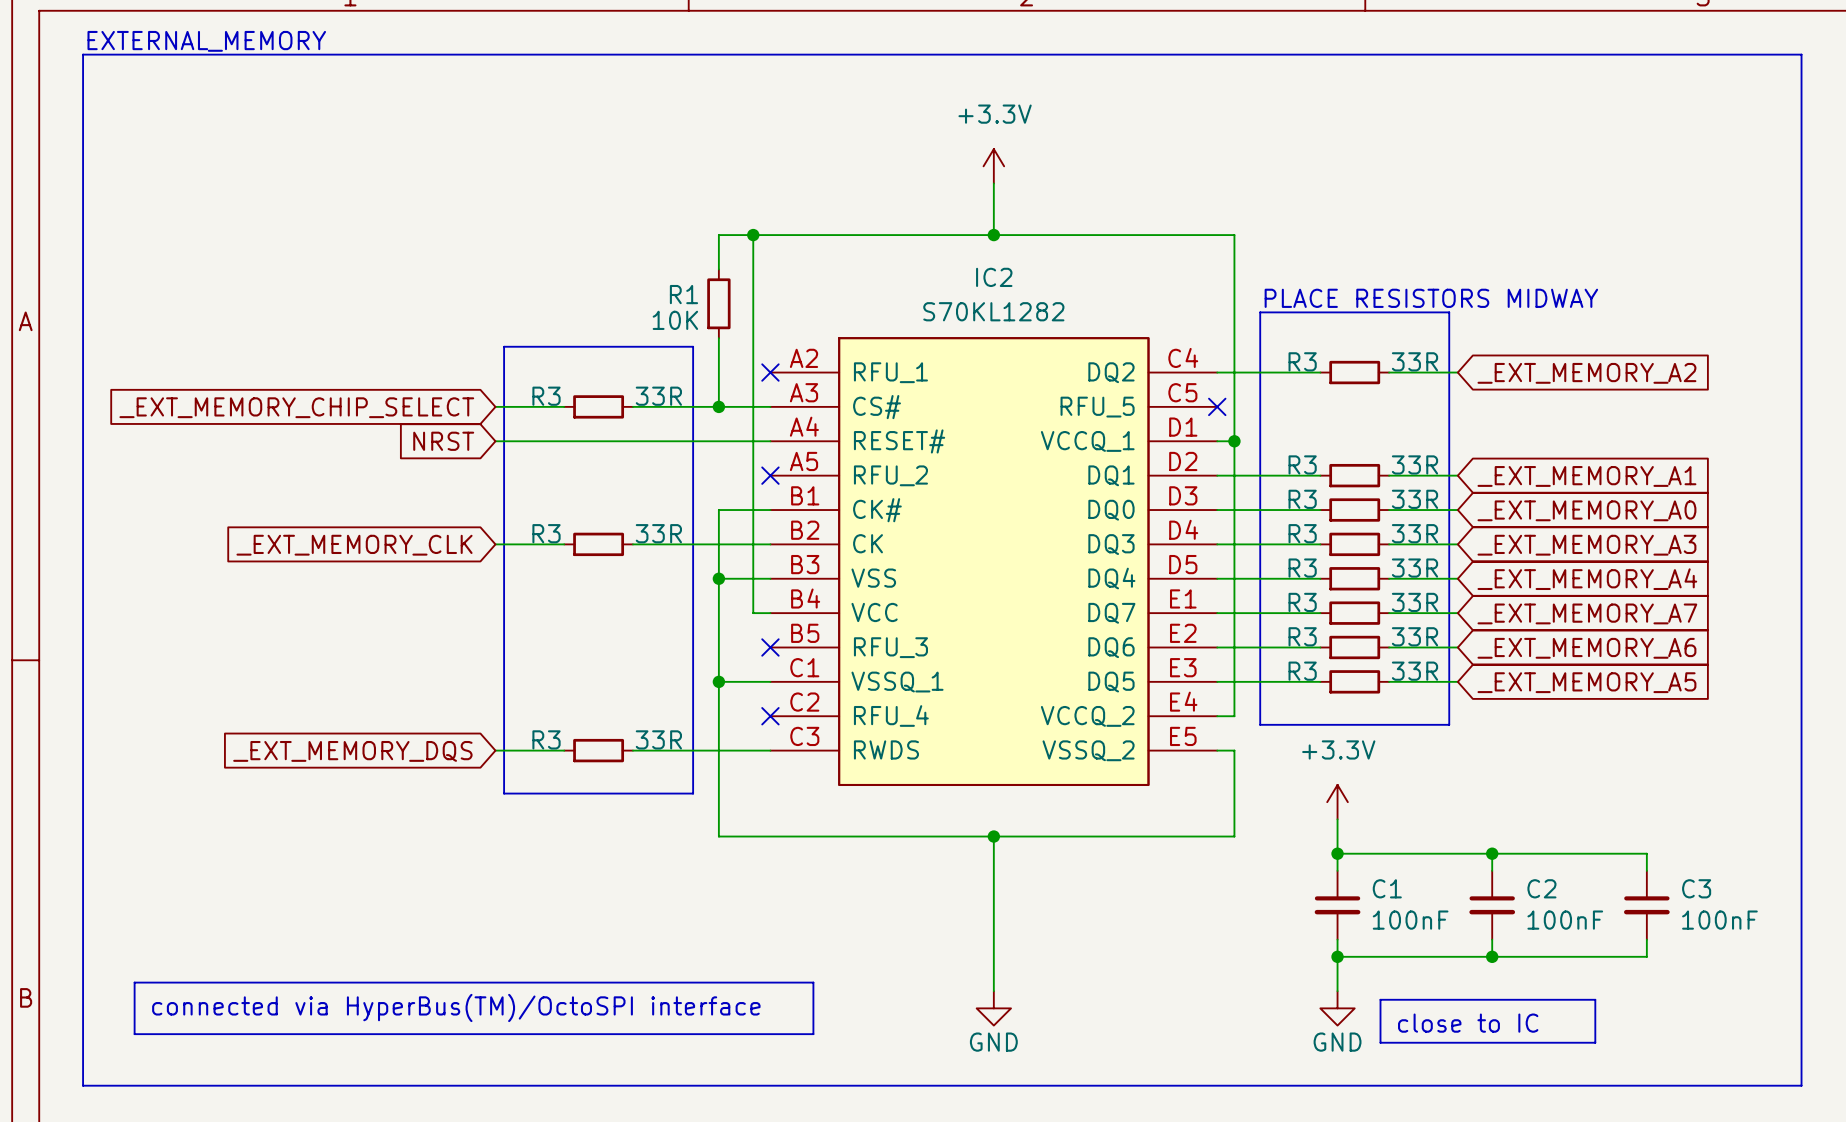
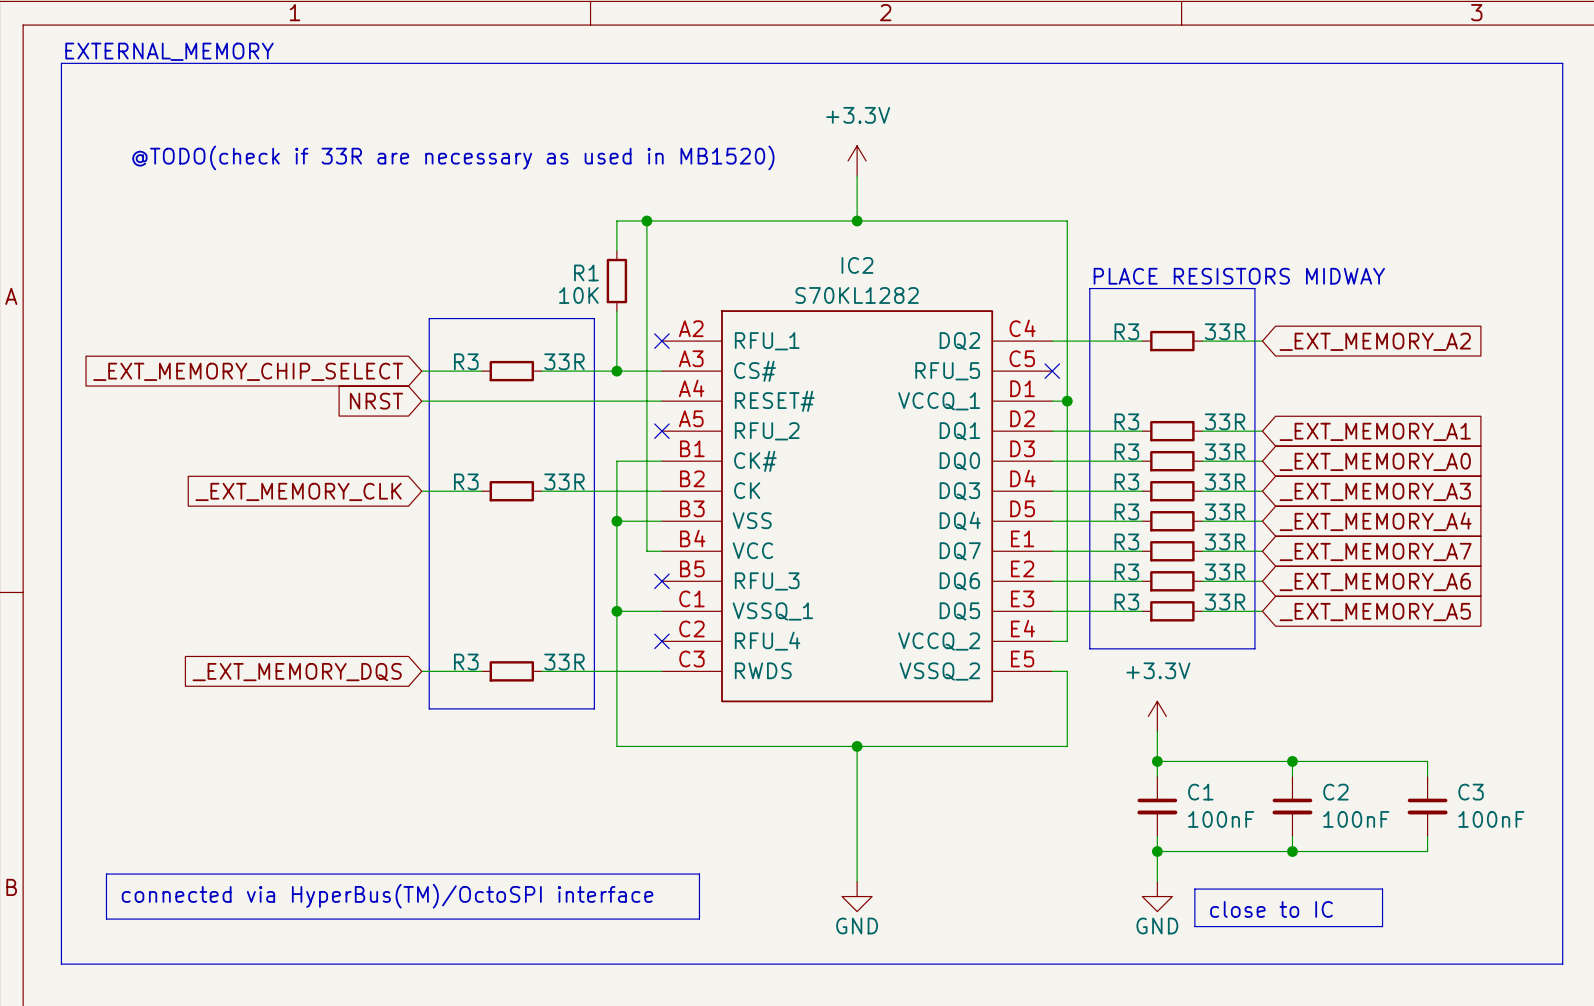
text: none -> @TODO(check if 33R are necessary as used in MB1520) (453, 157)
IC2 symbol: [770, 337, 1218, 787] -> [661, 310, 1053, 703]

